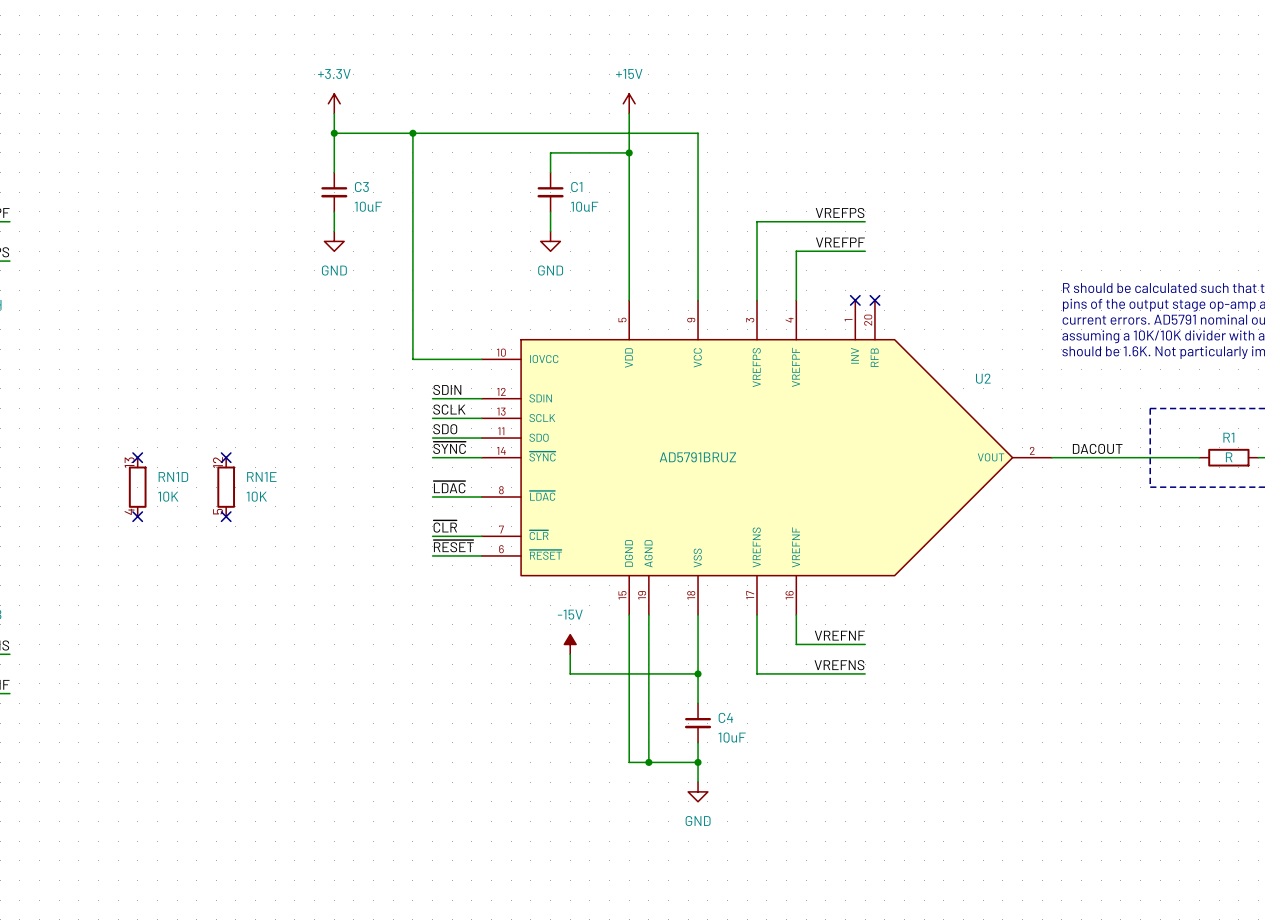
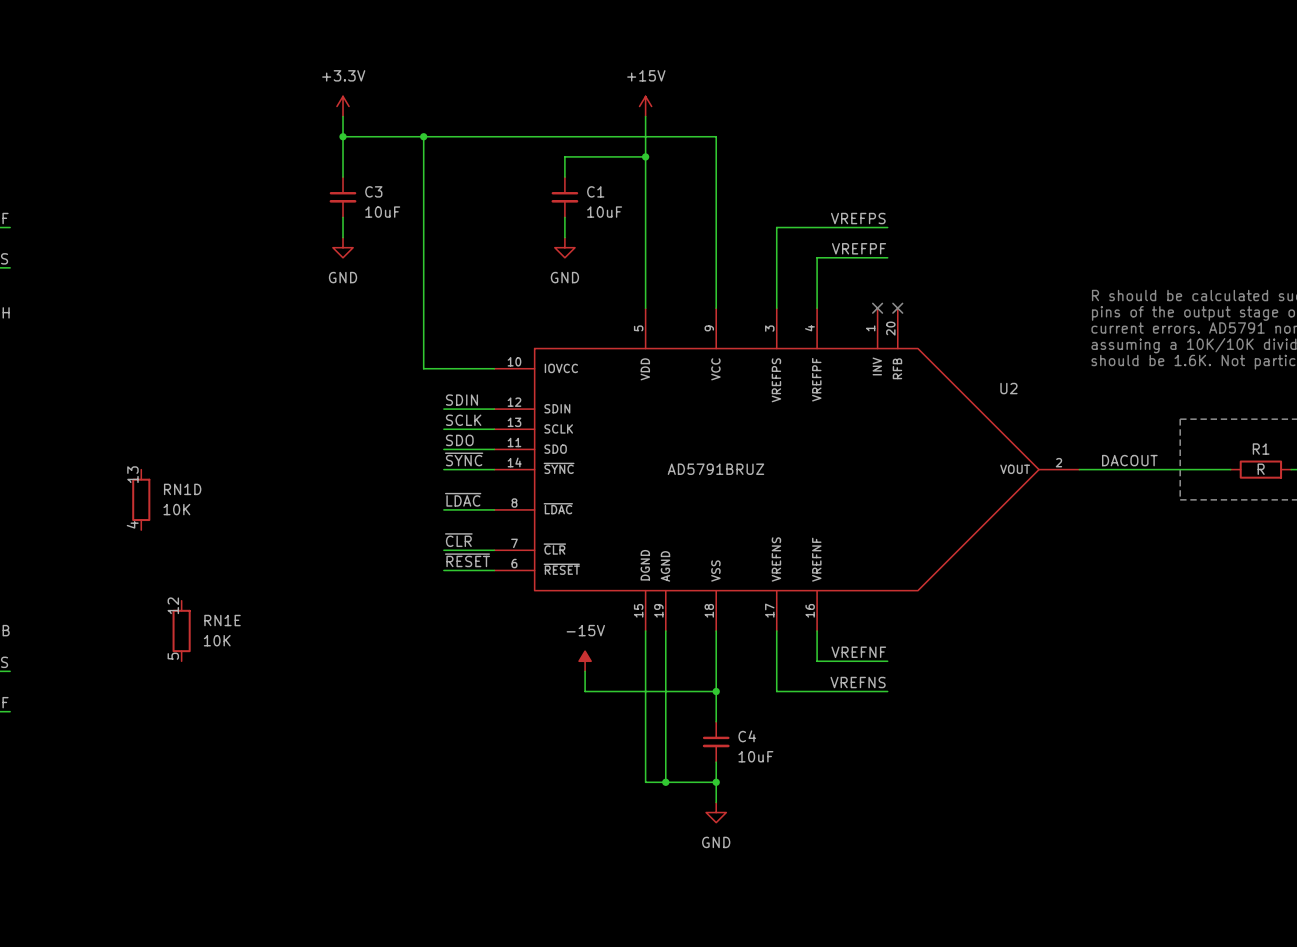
no-connect mark: (137, 457) -> none
no-connect mark: (226, 457) -> none
RN1E position: (226, 487) -> (181, 630)
no-connect mark: (137, 516) -> none
no-connect mark: (226, 516) -> none

